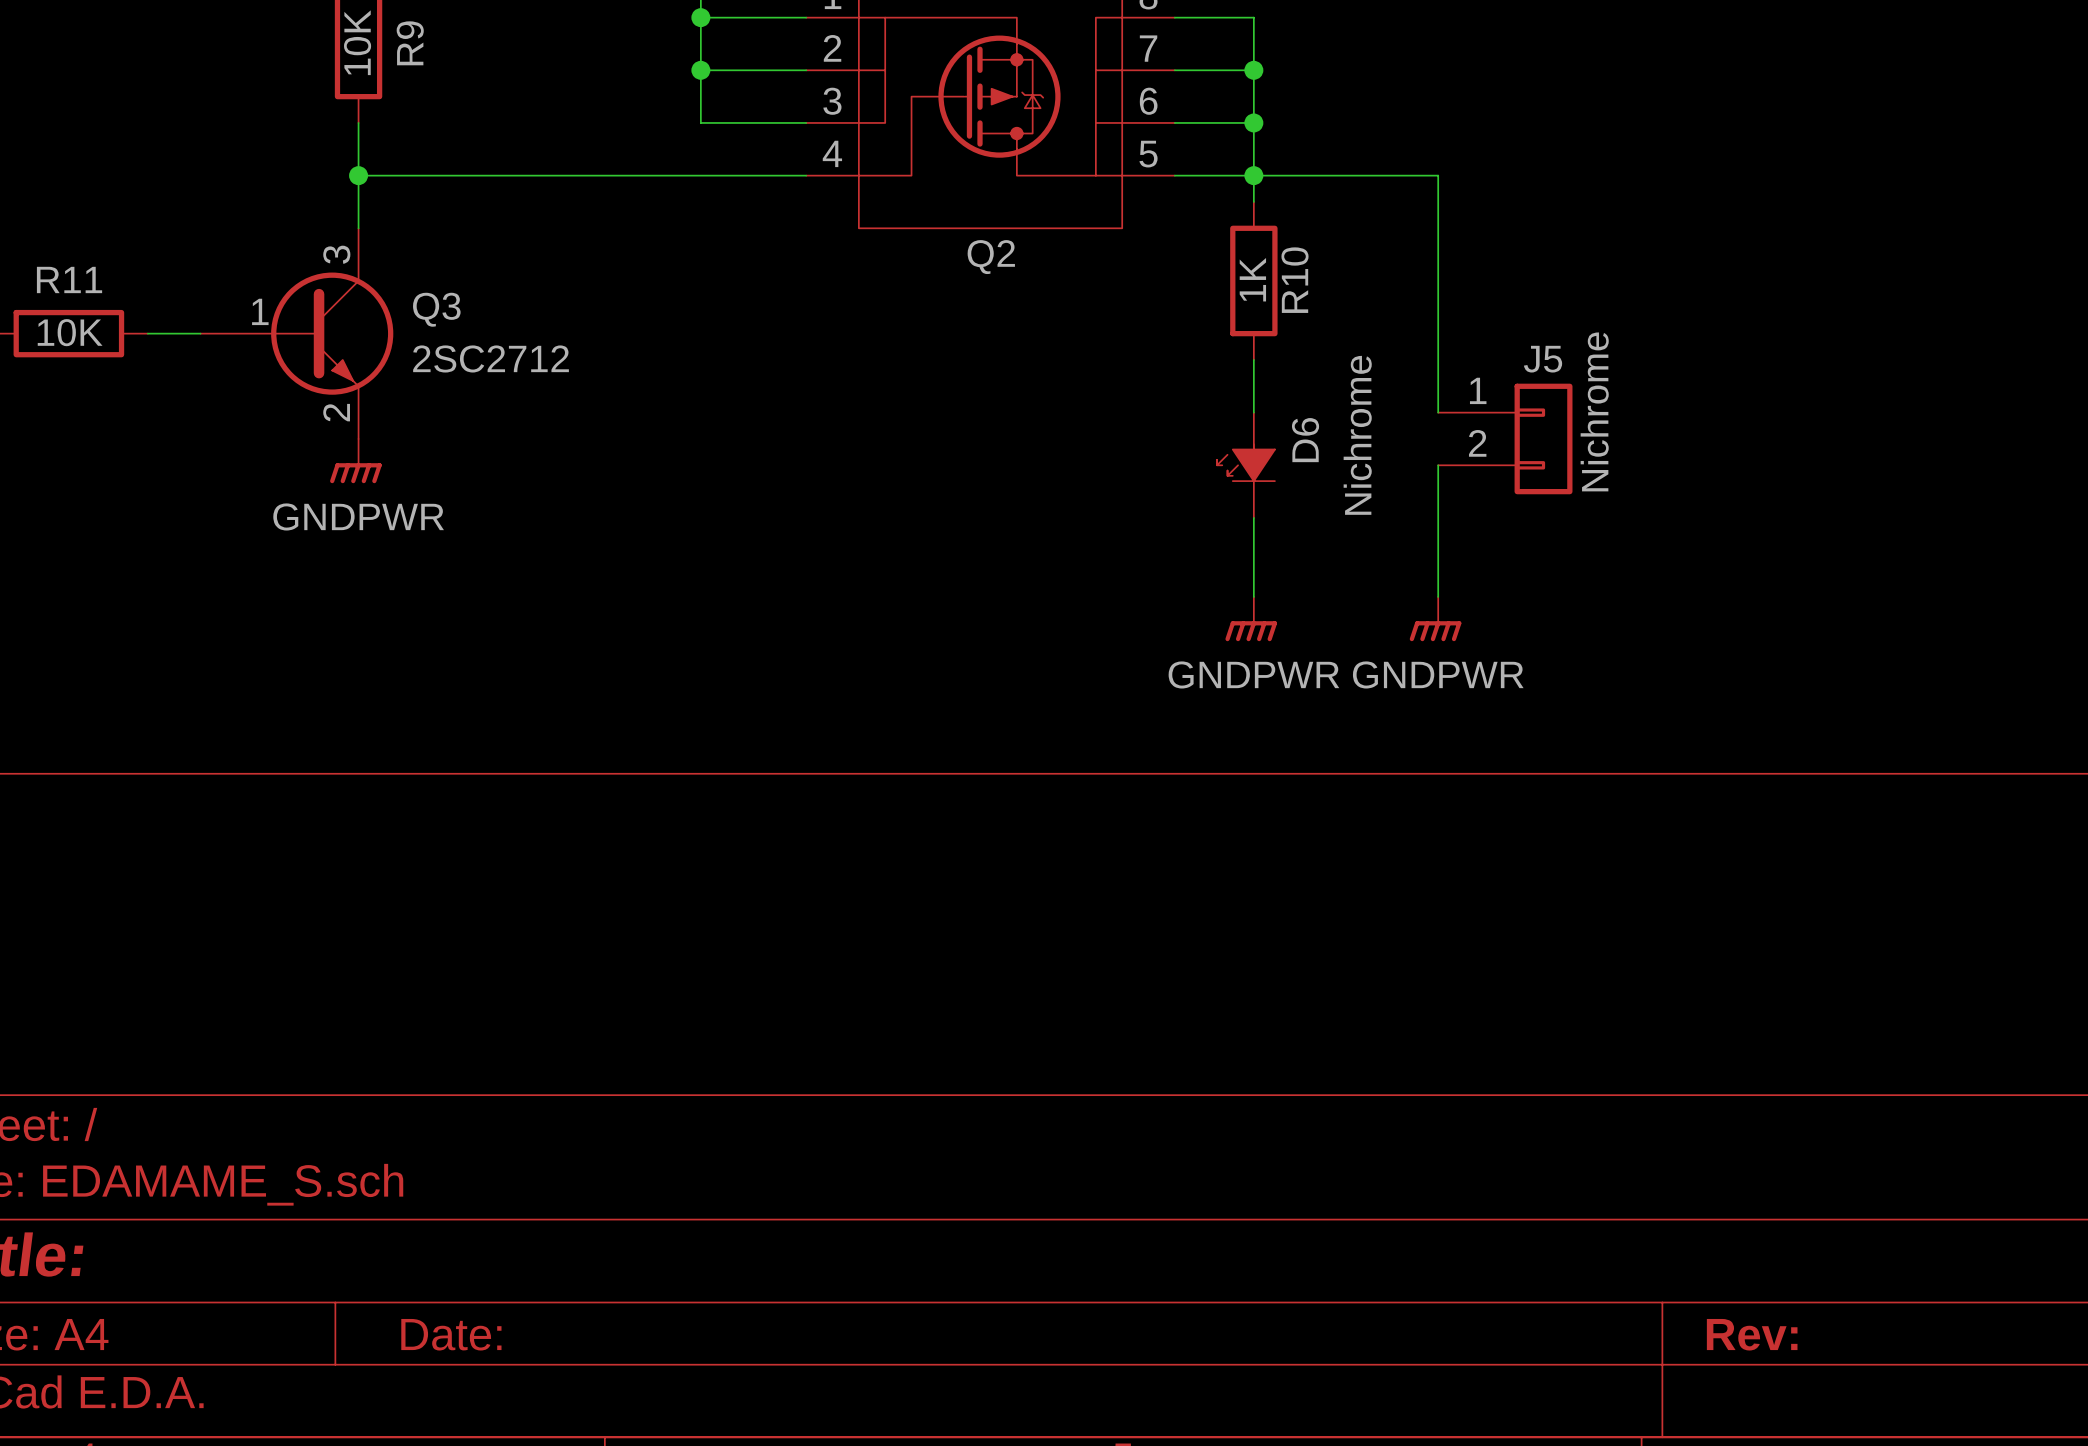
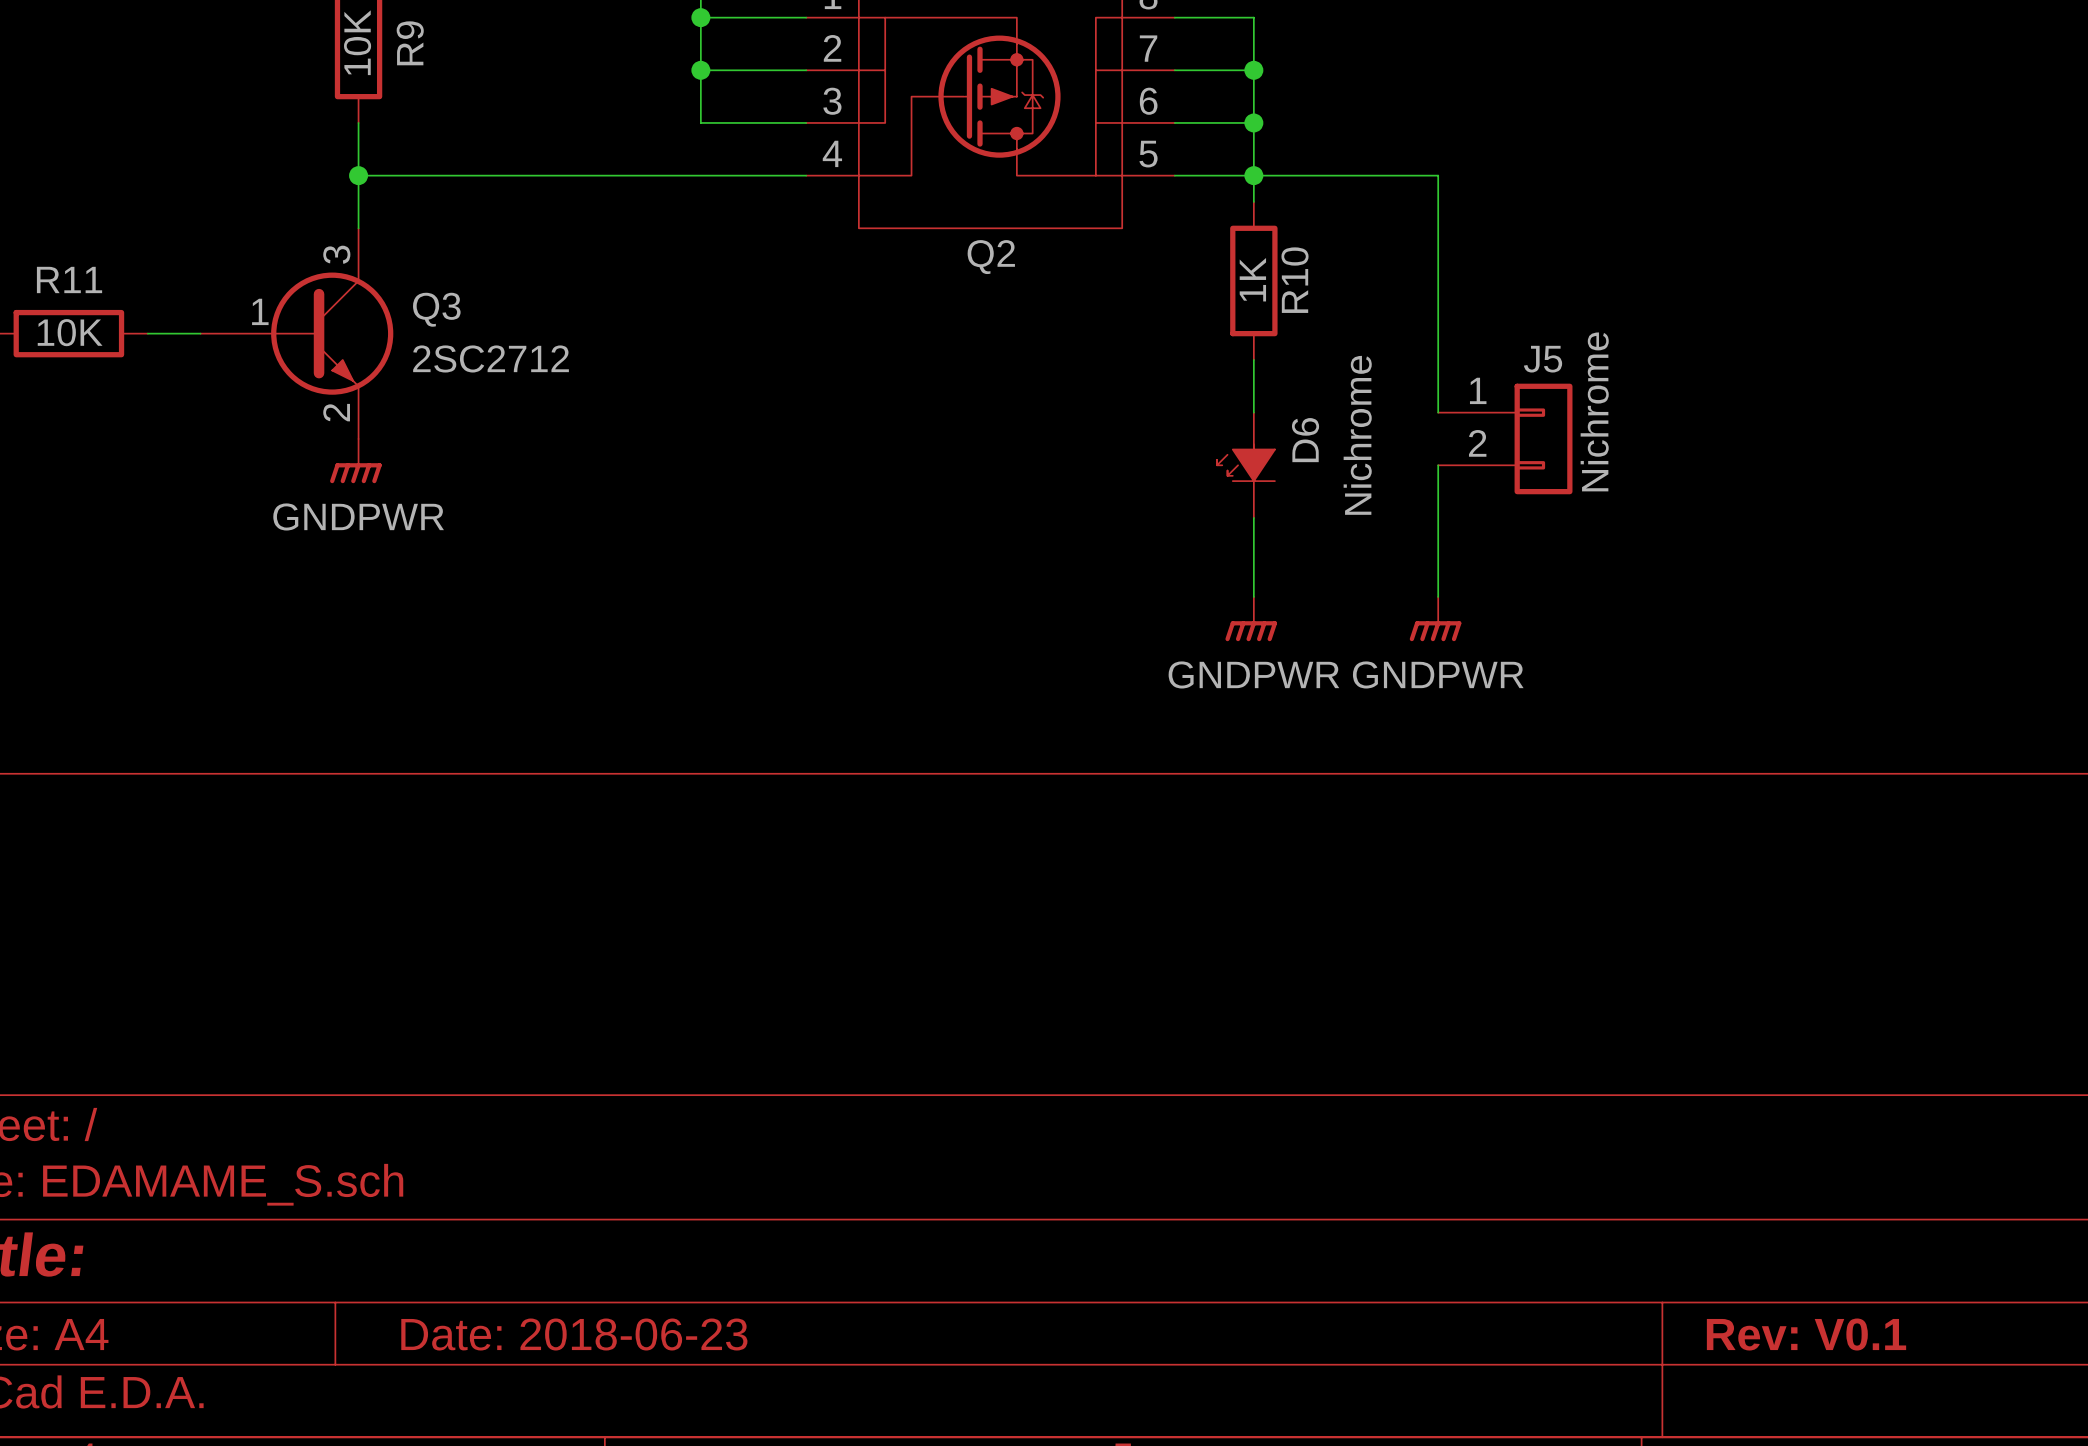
title block: Date: (451, 1334) -> Date: 2018-06-23 (574, 1334)
title block: Rev: (1752, 1334) -> Rev: V0.1 (1806, 1334)

